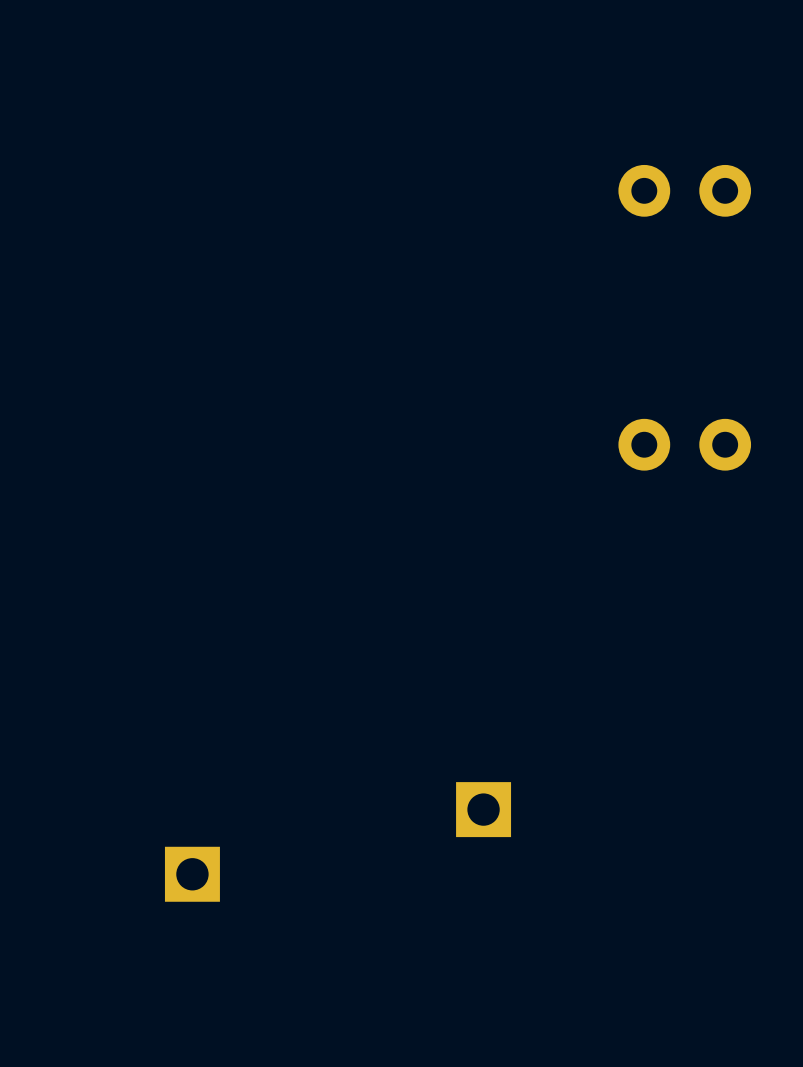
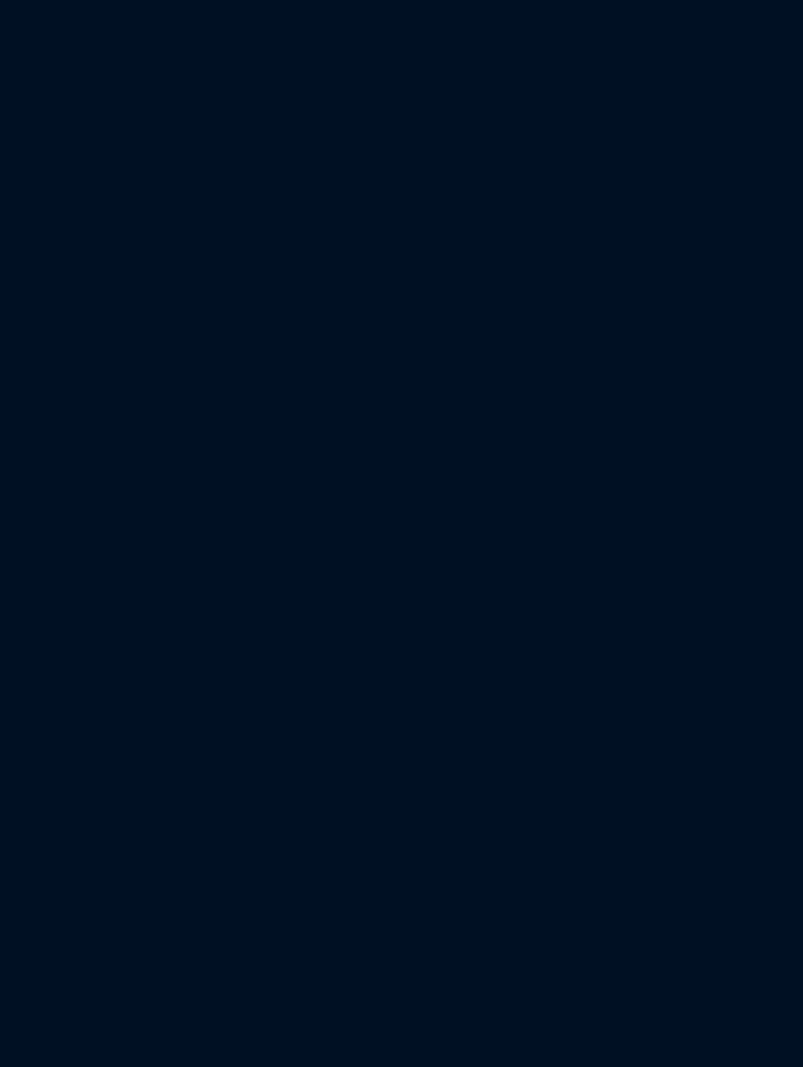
part: (684, 190) -> none
part: (684, 444) -> none
part: (483, 809) -> none
part: (192, 874) -> none

